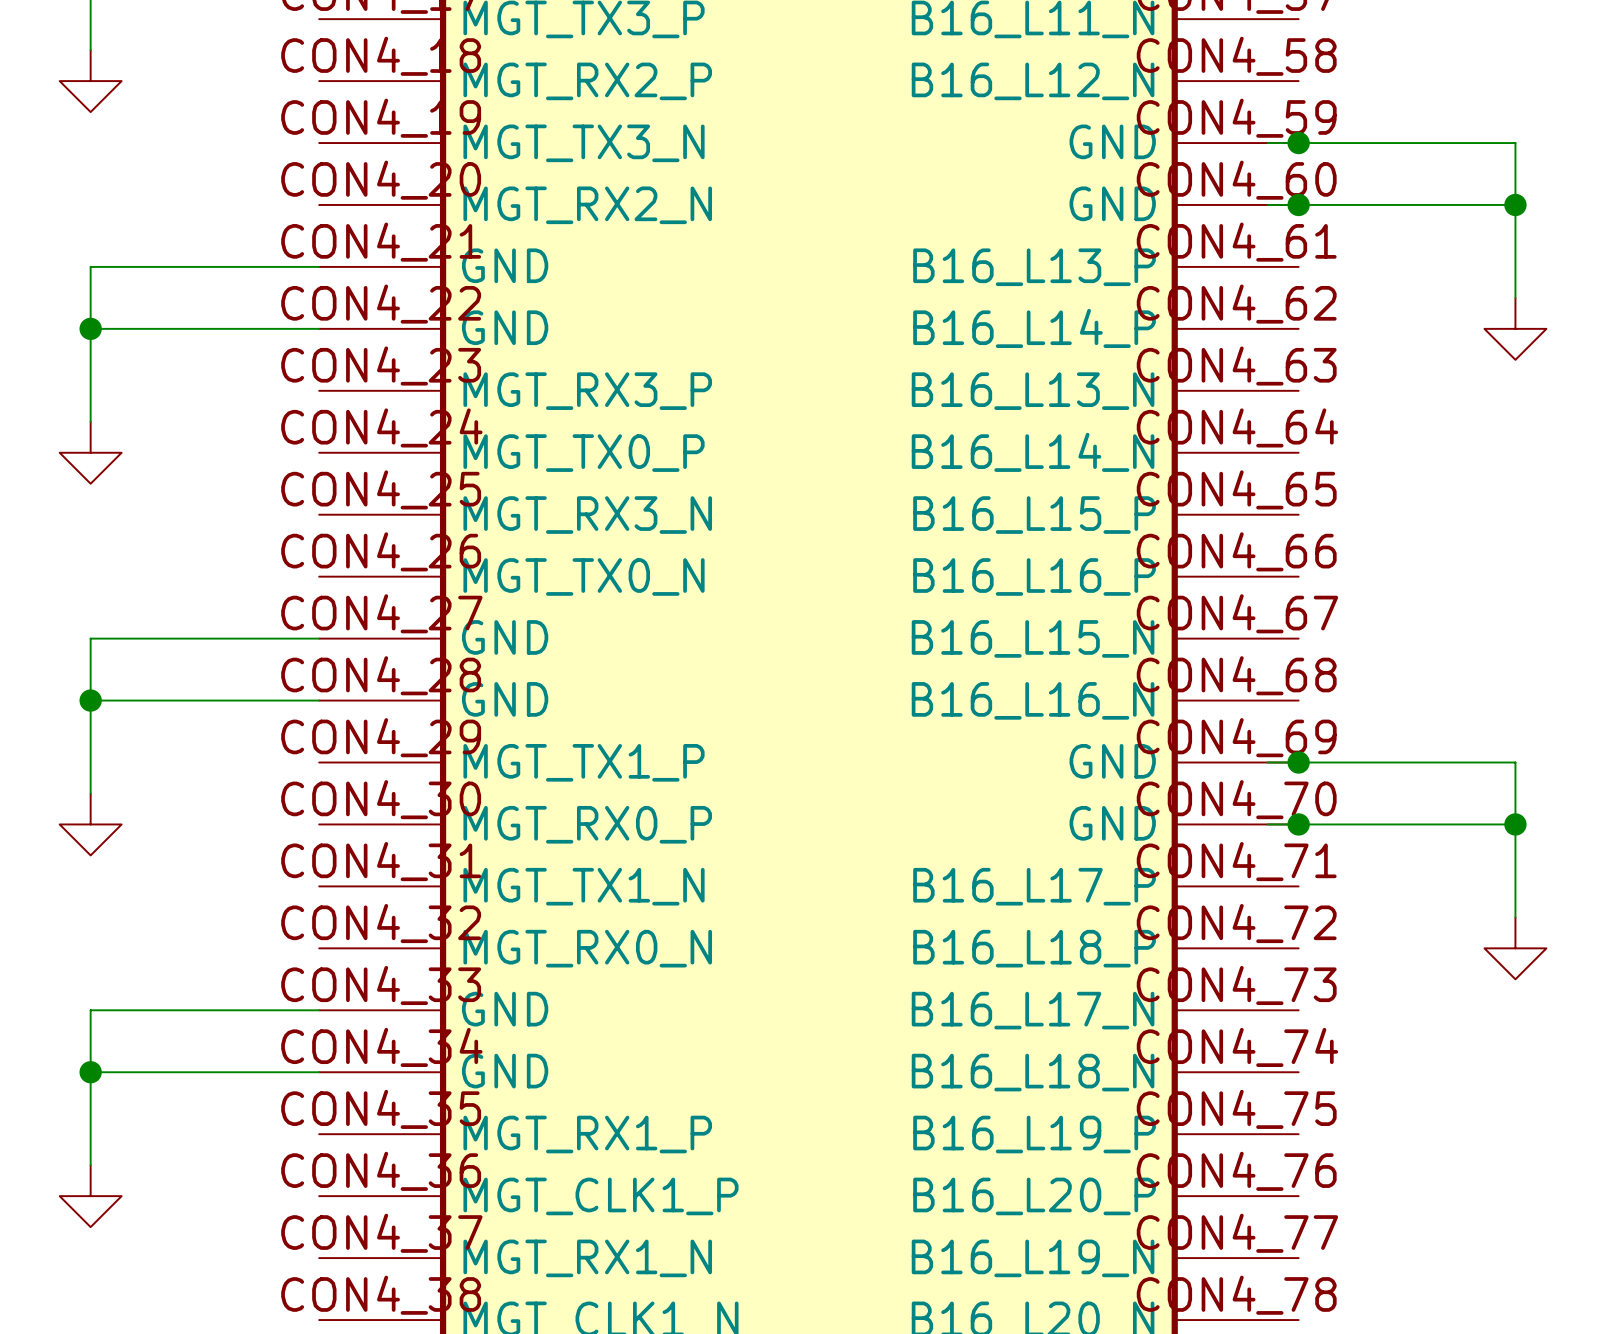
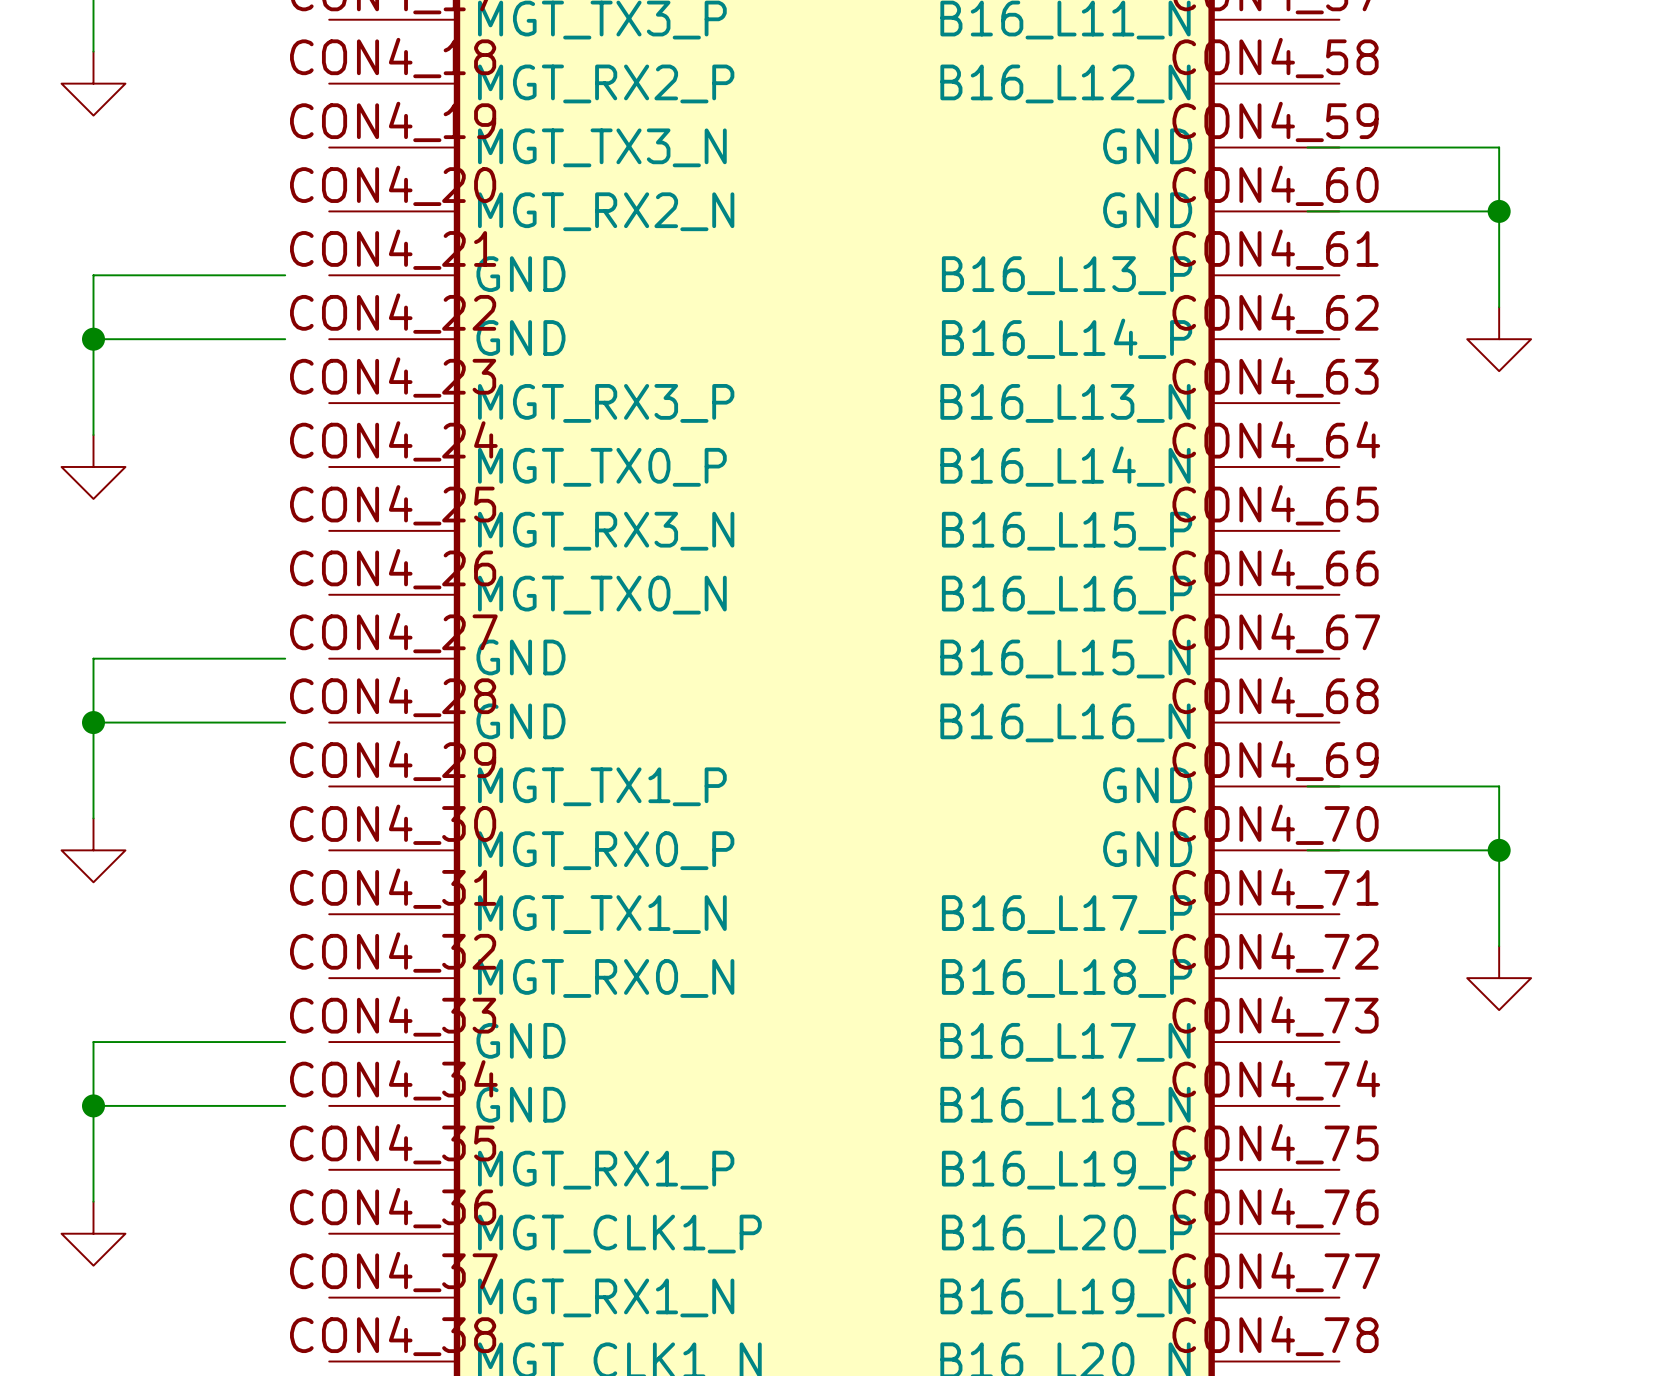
junction: (1298, 143) -> none
wire: (1453, 143) (1515, 143) (1515, 297) -> (1499, 147) (1499, 307)
junction: (1298, 204) -> none
wire: (1453, 204) (1515, 204) -> none
junction position: (1515, 204) -> (1499, 211)
wire: (276, 266) (319, 266) -> none
wire: (276, 328) (319, 328) -> none
power symbol position: (1515, 328) -> (1499, 339)
wire: (276, 638) (319, 638) -> none
wire: (276, 700) (319, 700) -> none
junction: (1298, 762) -> none
wire: (1453, 762) (1515, 762) (1515, 917) -> (1499, 786) (1499, 946)
junction: (1298, 824) -> none
wire: (1453, 824) (1515, 824) -> none
junction position: (1515, 824) -> (1499, 850)
power symbol position: (1515, 948) -> (1499, 978)
wire: (276, 1010) (319, 1010) -> none
wire: (276, 1072) (319, 1072) -> none

